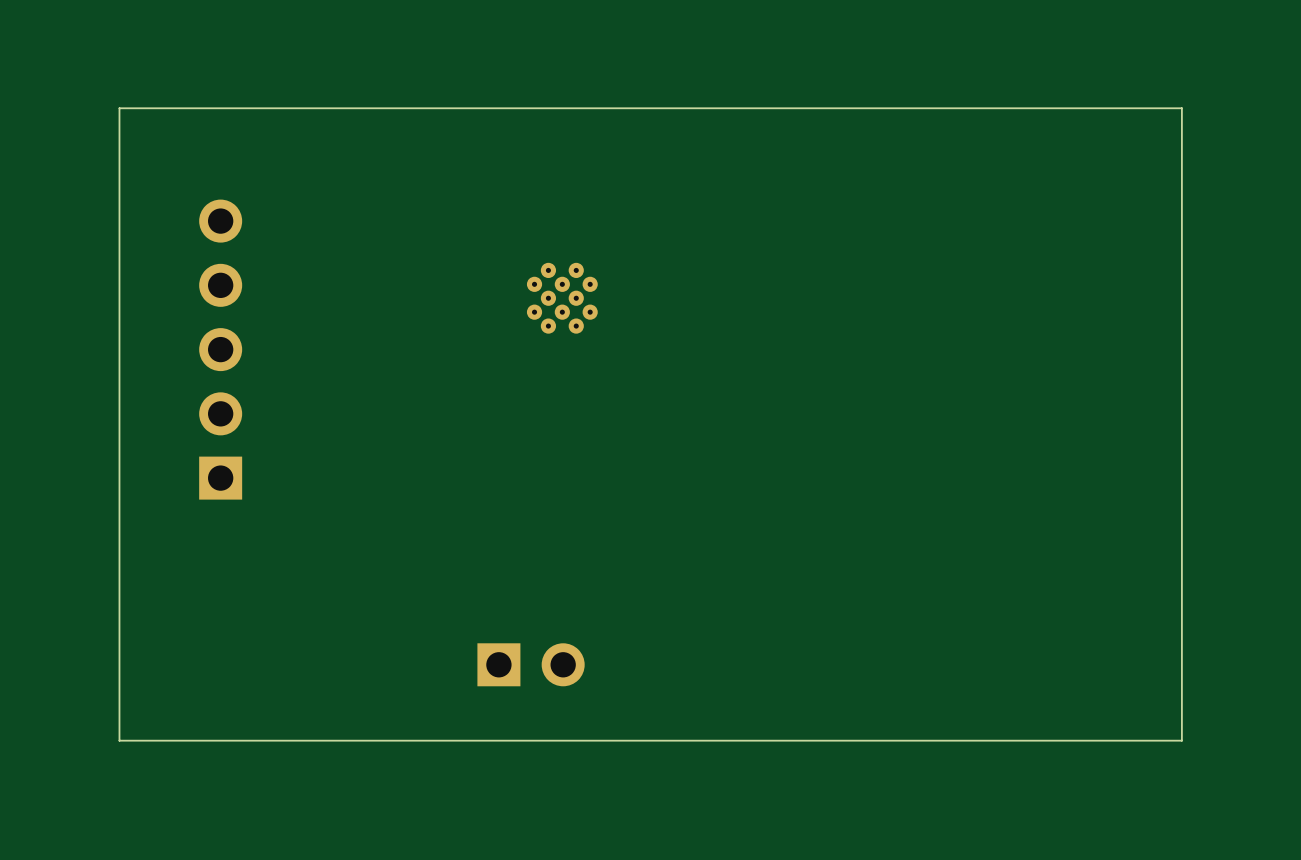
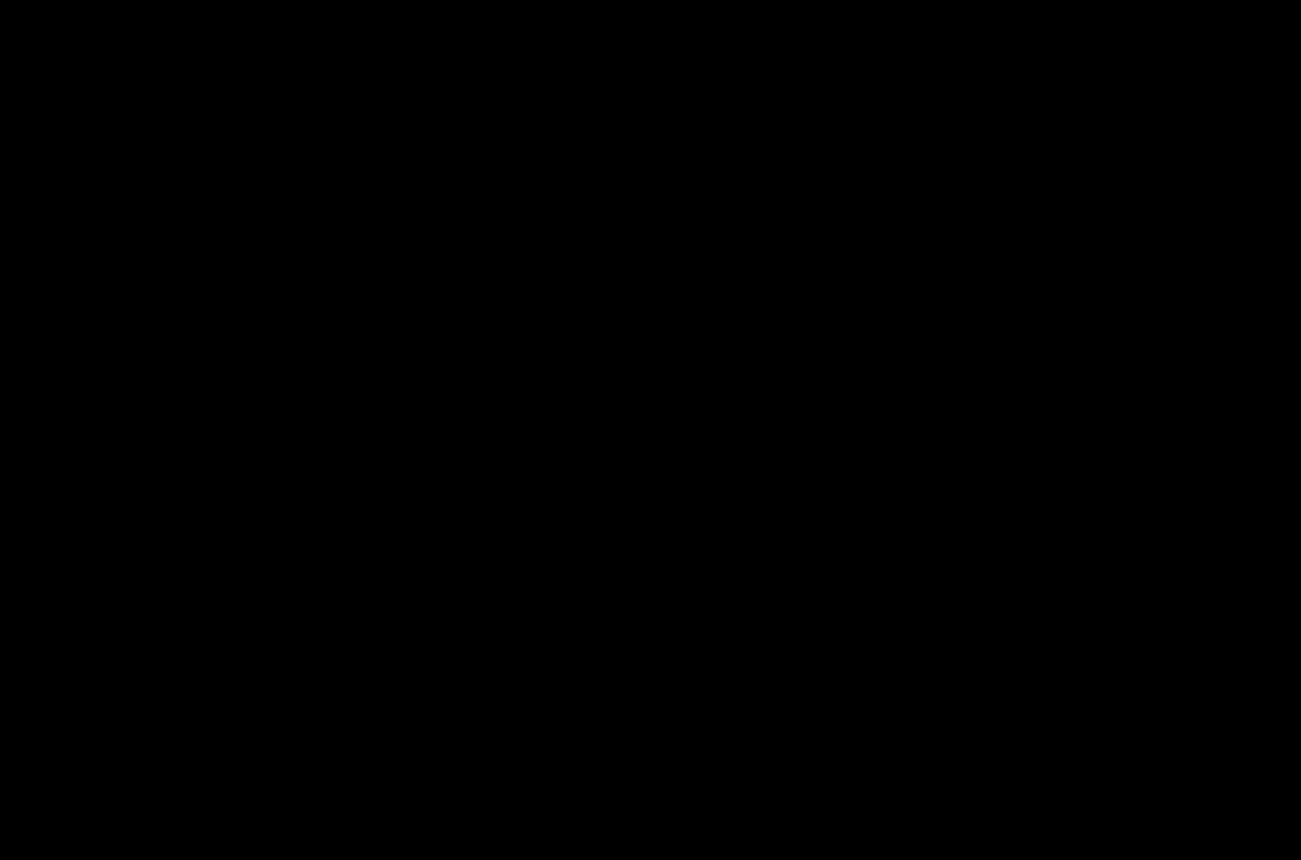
board edge: (1181, 108) (119, 108) (119, 740) (1181, 740) (1181, 108) -> none
part: (562, 298) -> none
part: (220, 349) -> none
part: (531, 664) -> none

